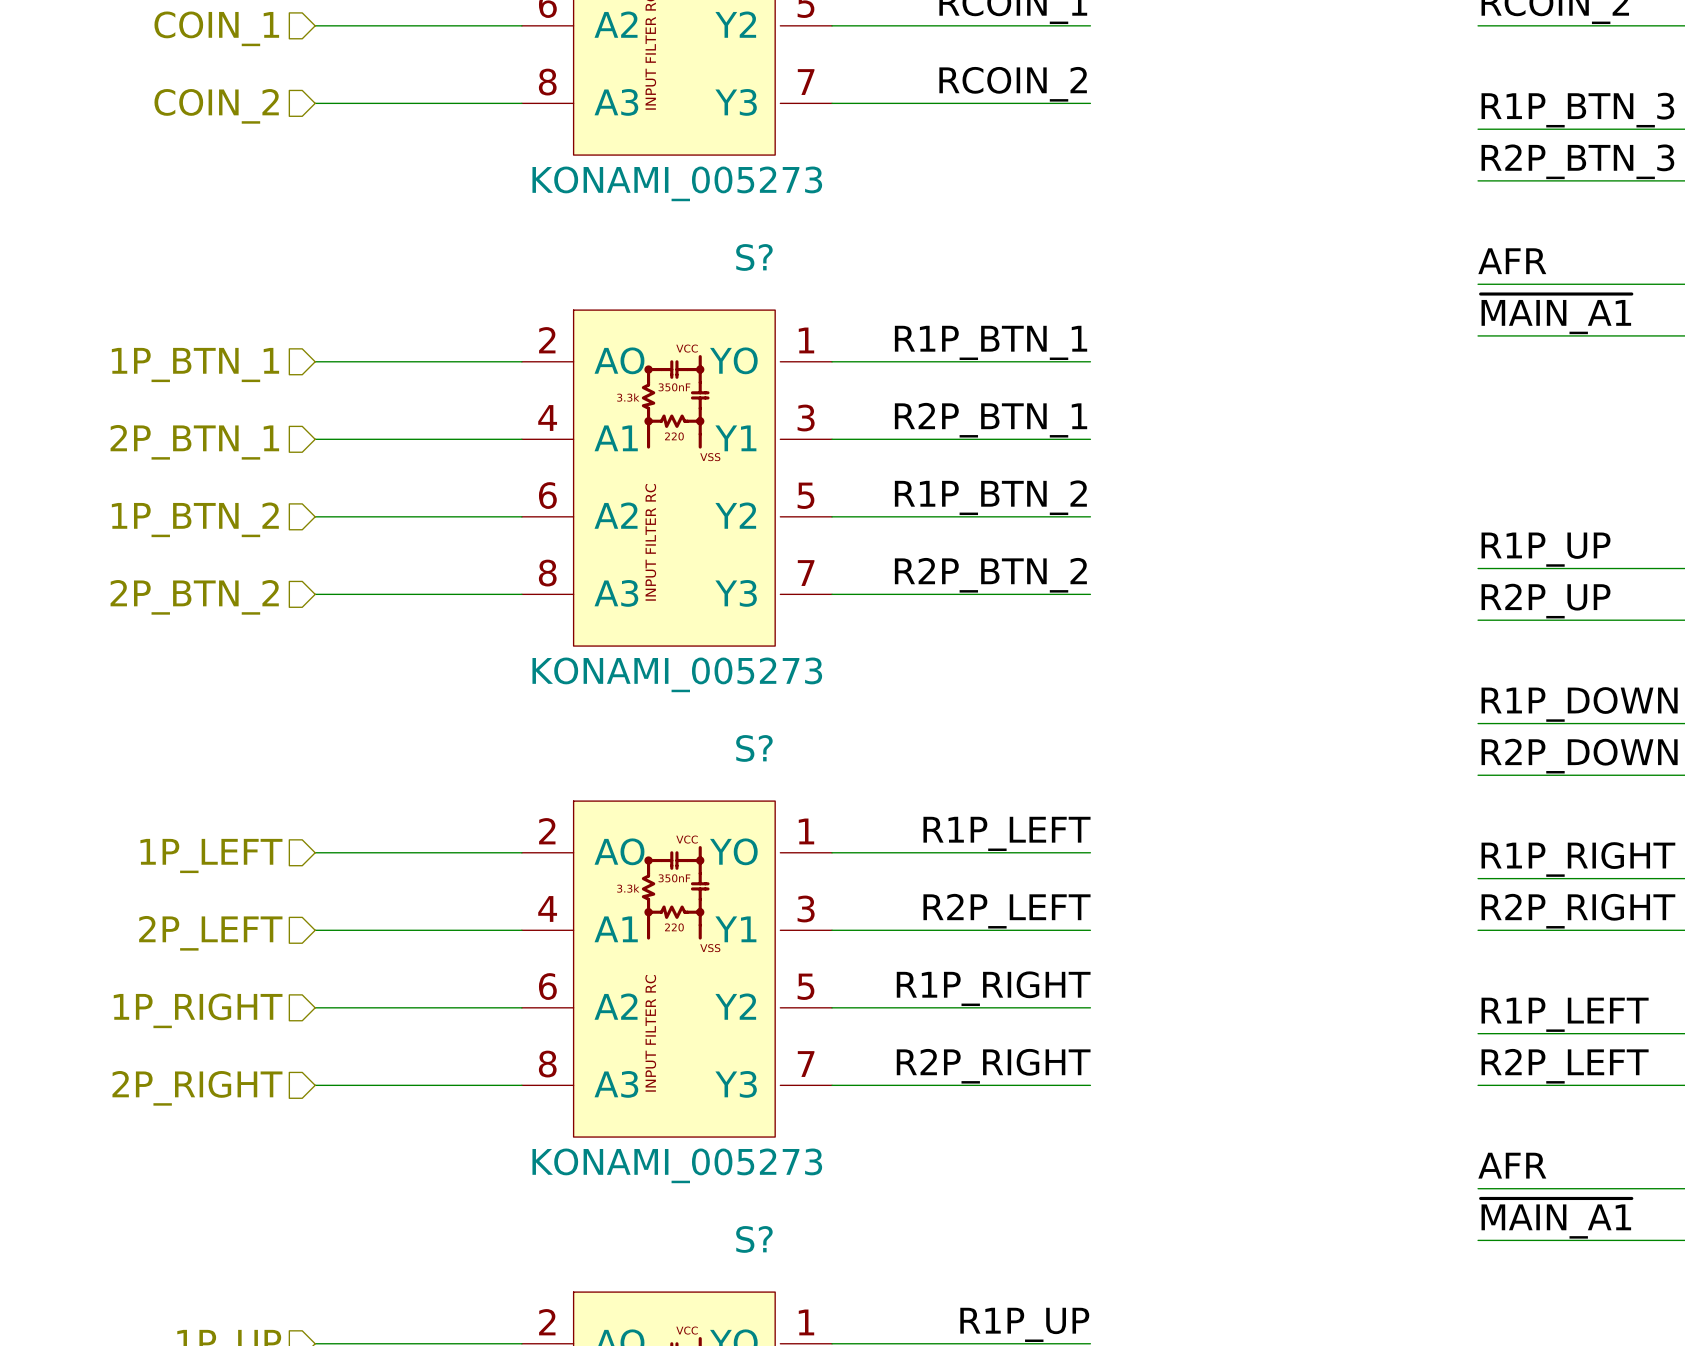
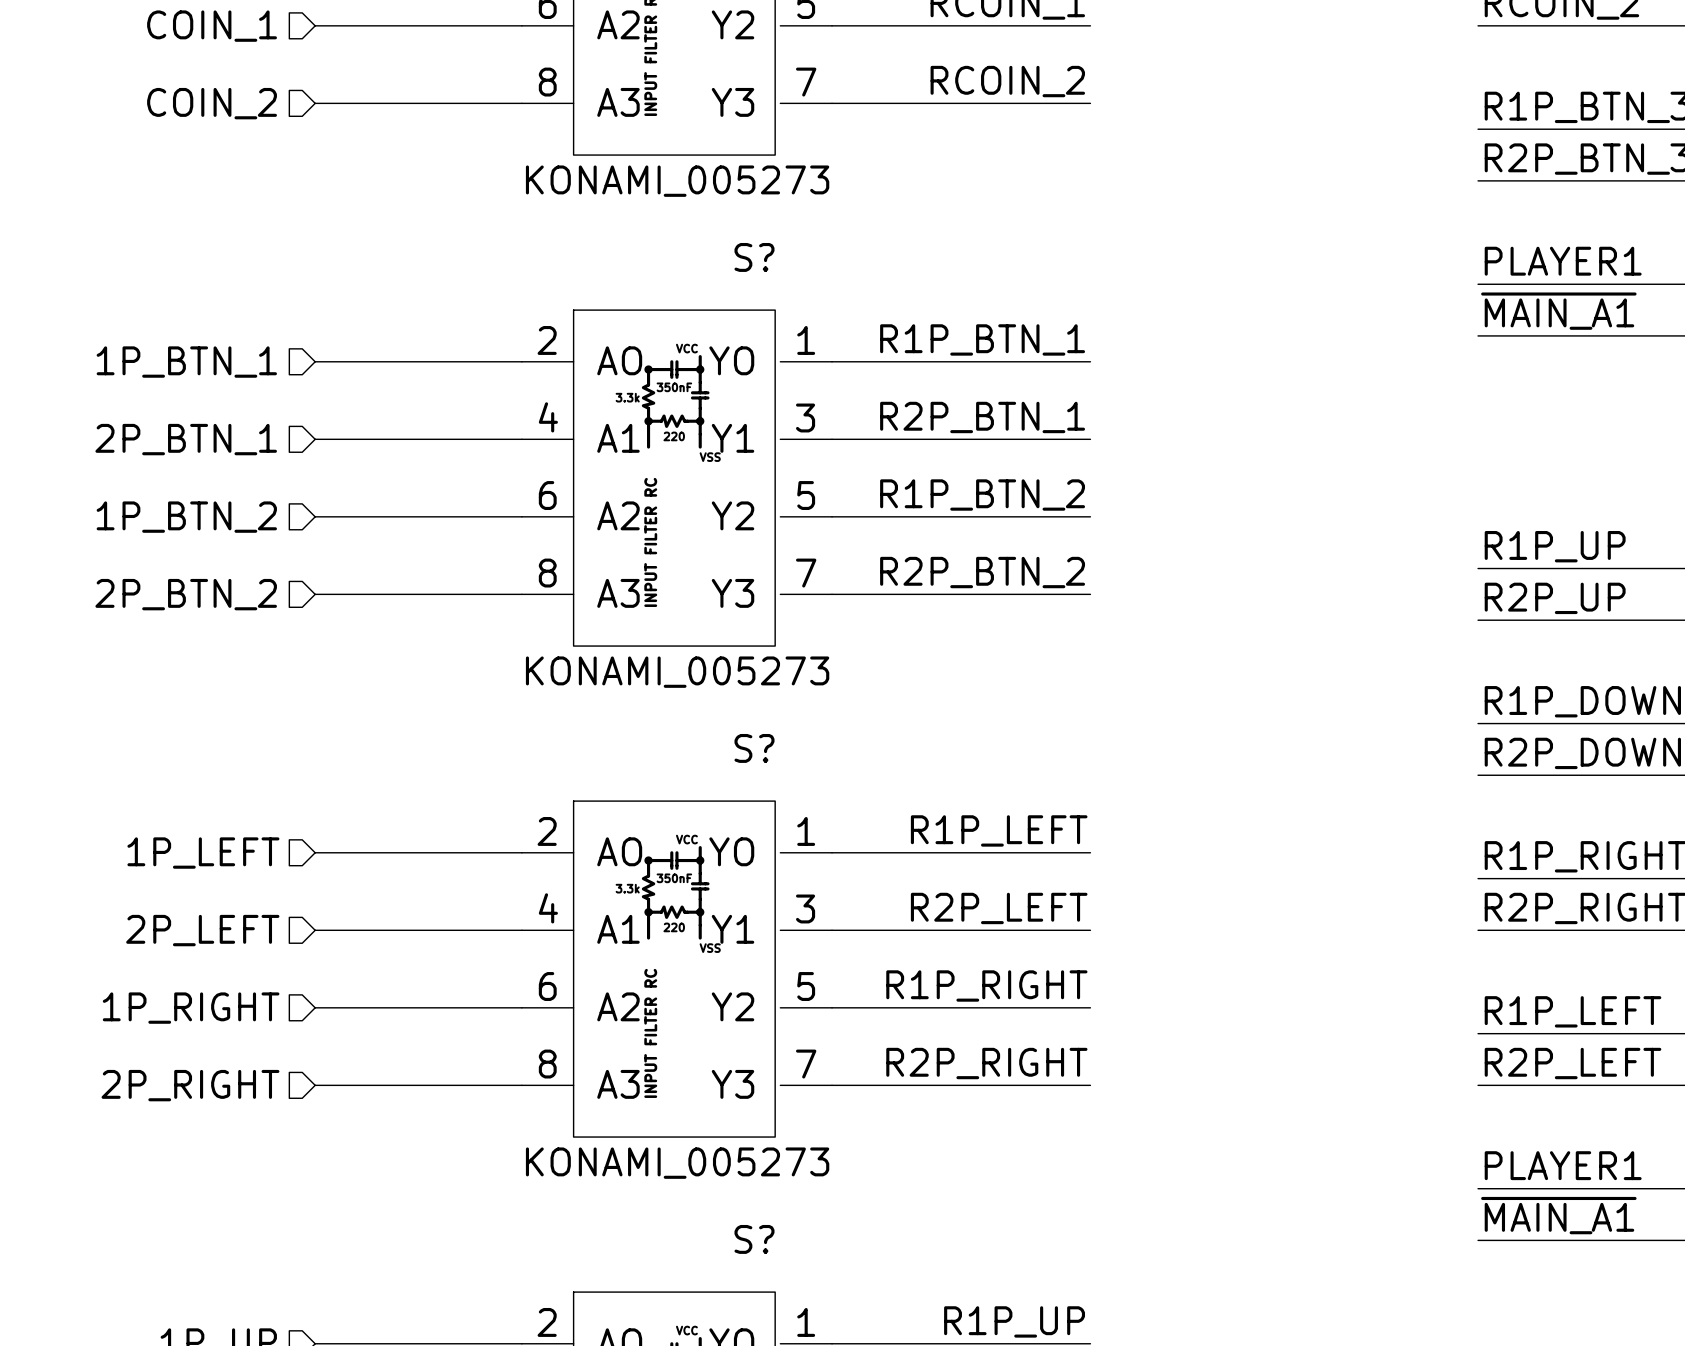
label: AFR (1512, 261) -> PLAYER1 (1563, 261)
label: AFR (1512, 1165) -> PLAYER1 (1563, 1165)

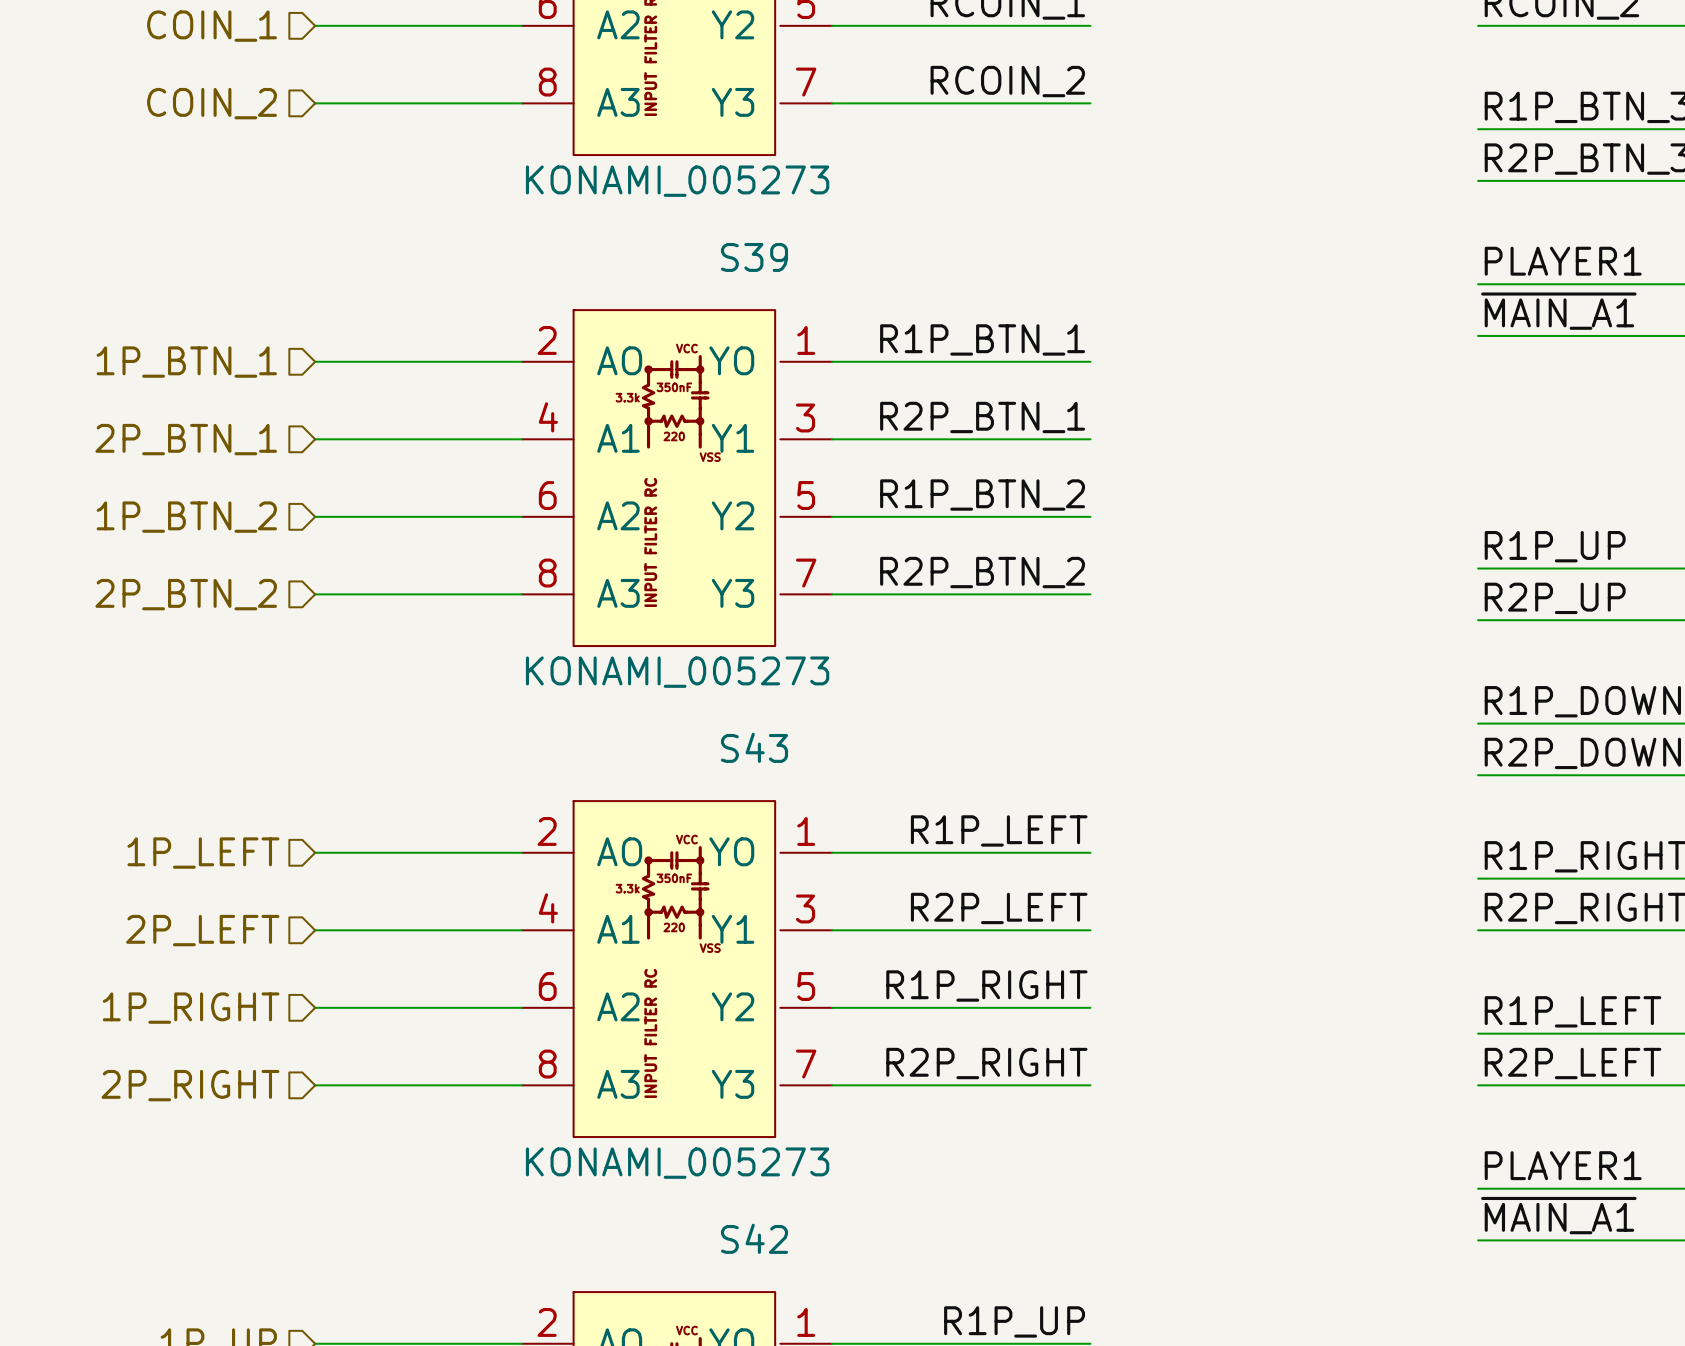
S? name: S? (754, 257) -> S39 (754, 257)
S? name: S? (754, 748) -> S43 (754, 747)
S? name: S? (754, 1239) -> S42 (754, 1238)

